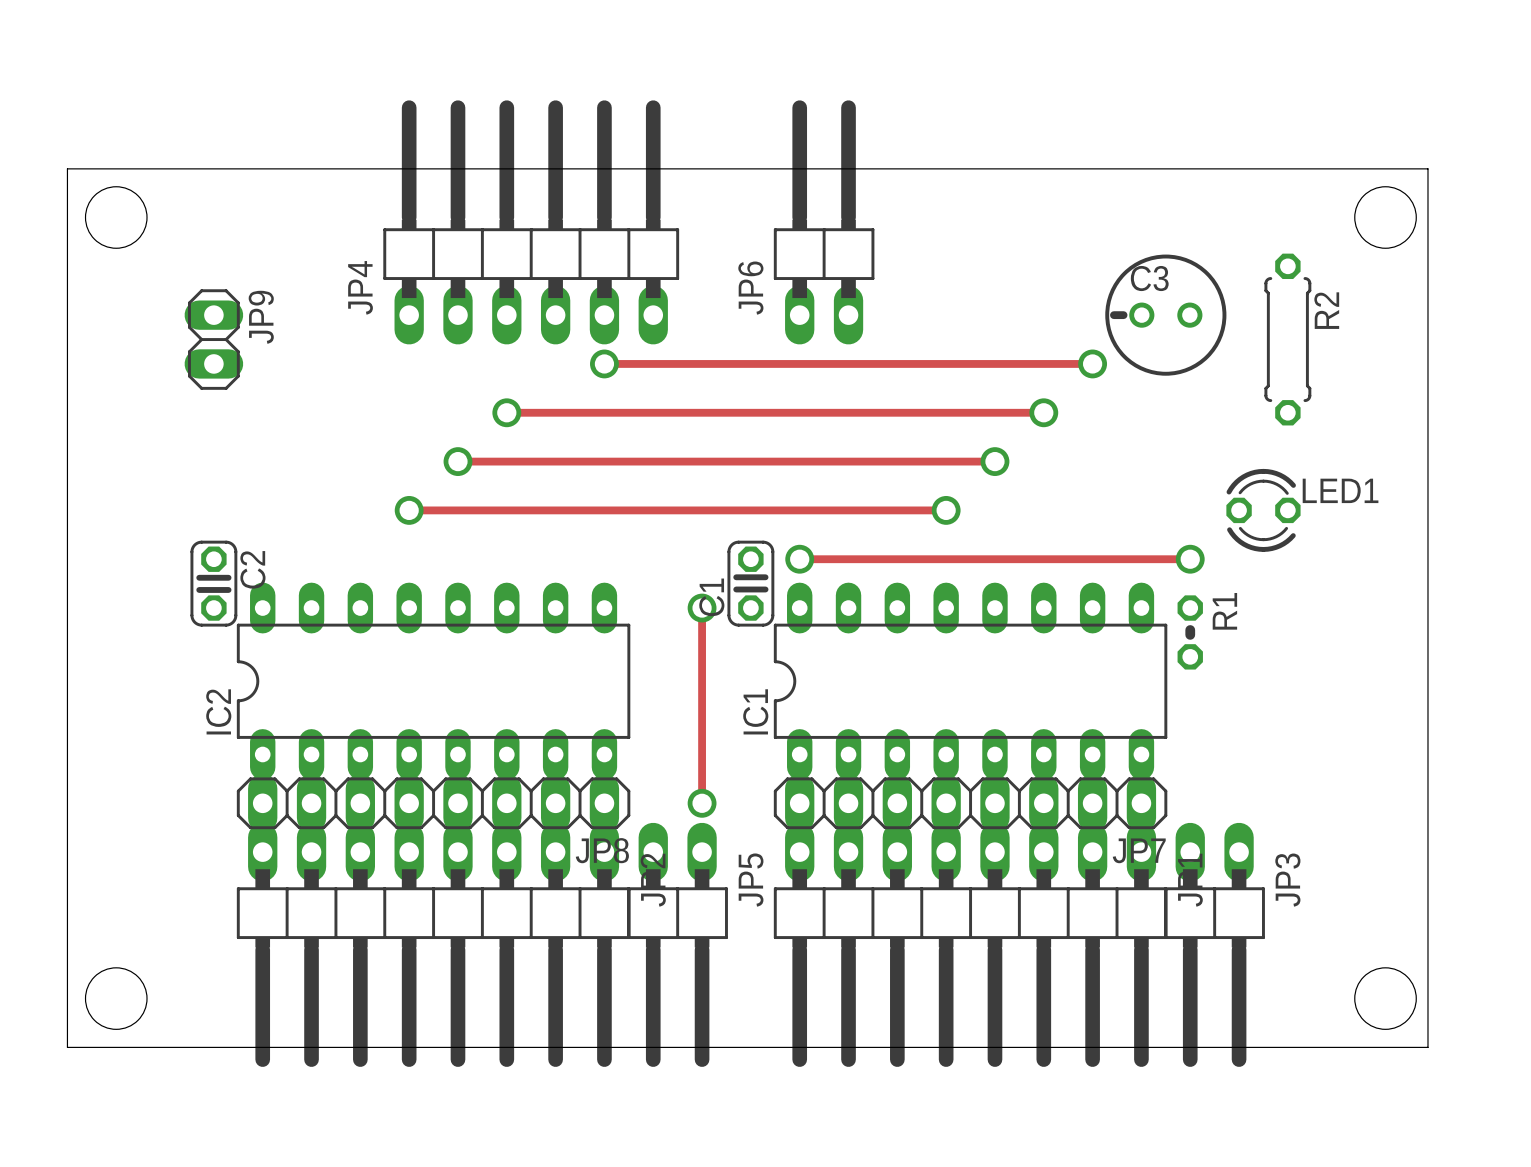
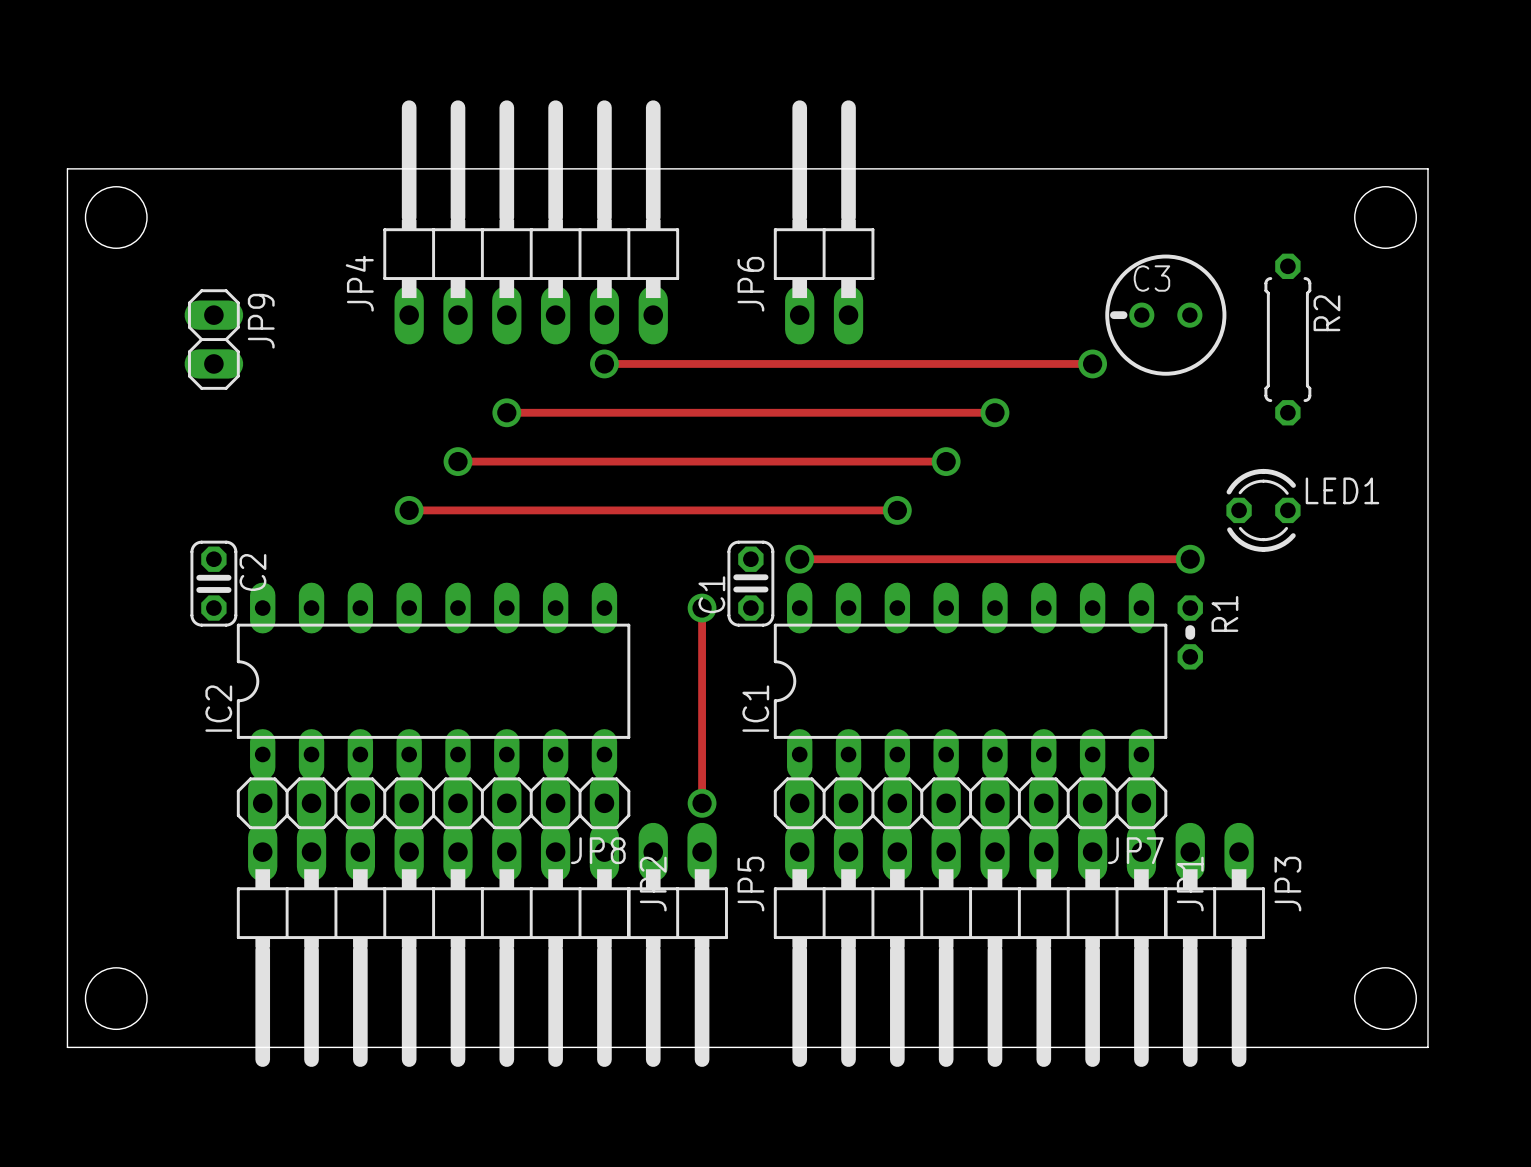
track: (994, 412) (1043, 412) -> none
via: none -> (994, 412)
via: (1043, 412) -> none
track: (946, 461) (994, 461) -> none
via: none -> (946, 461)
via: (994, 461) -> none
track: (897, 510) (946, 510) -> none
via: none -> (897, 510)
via: (946, 510) -> none

